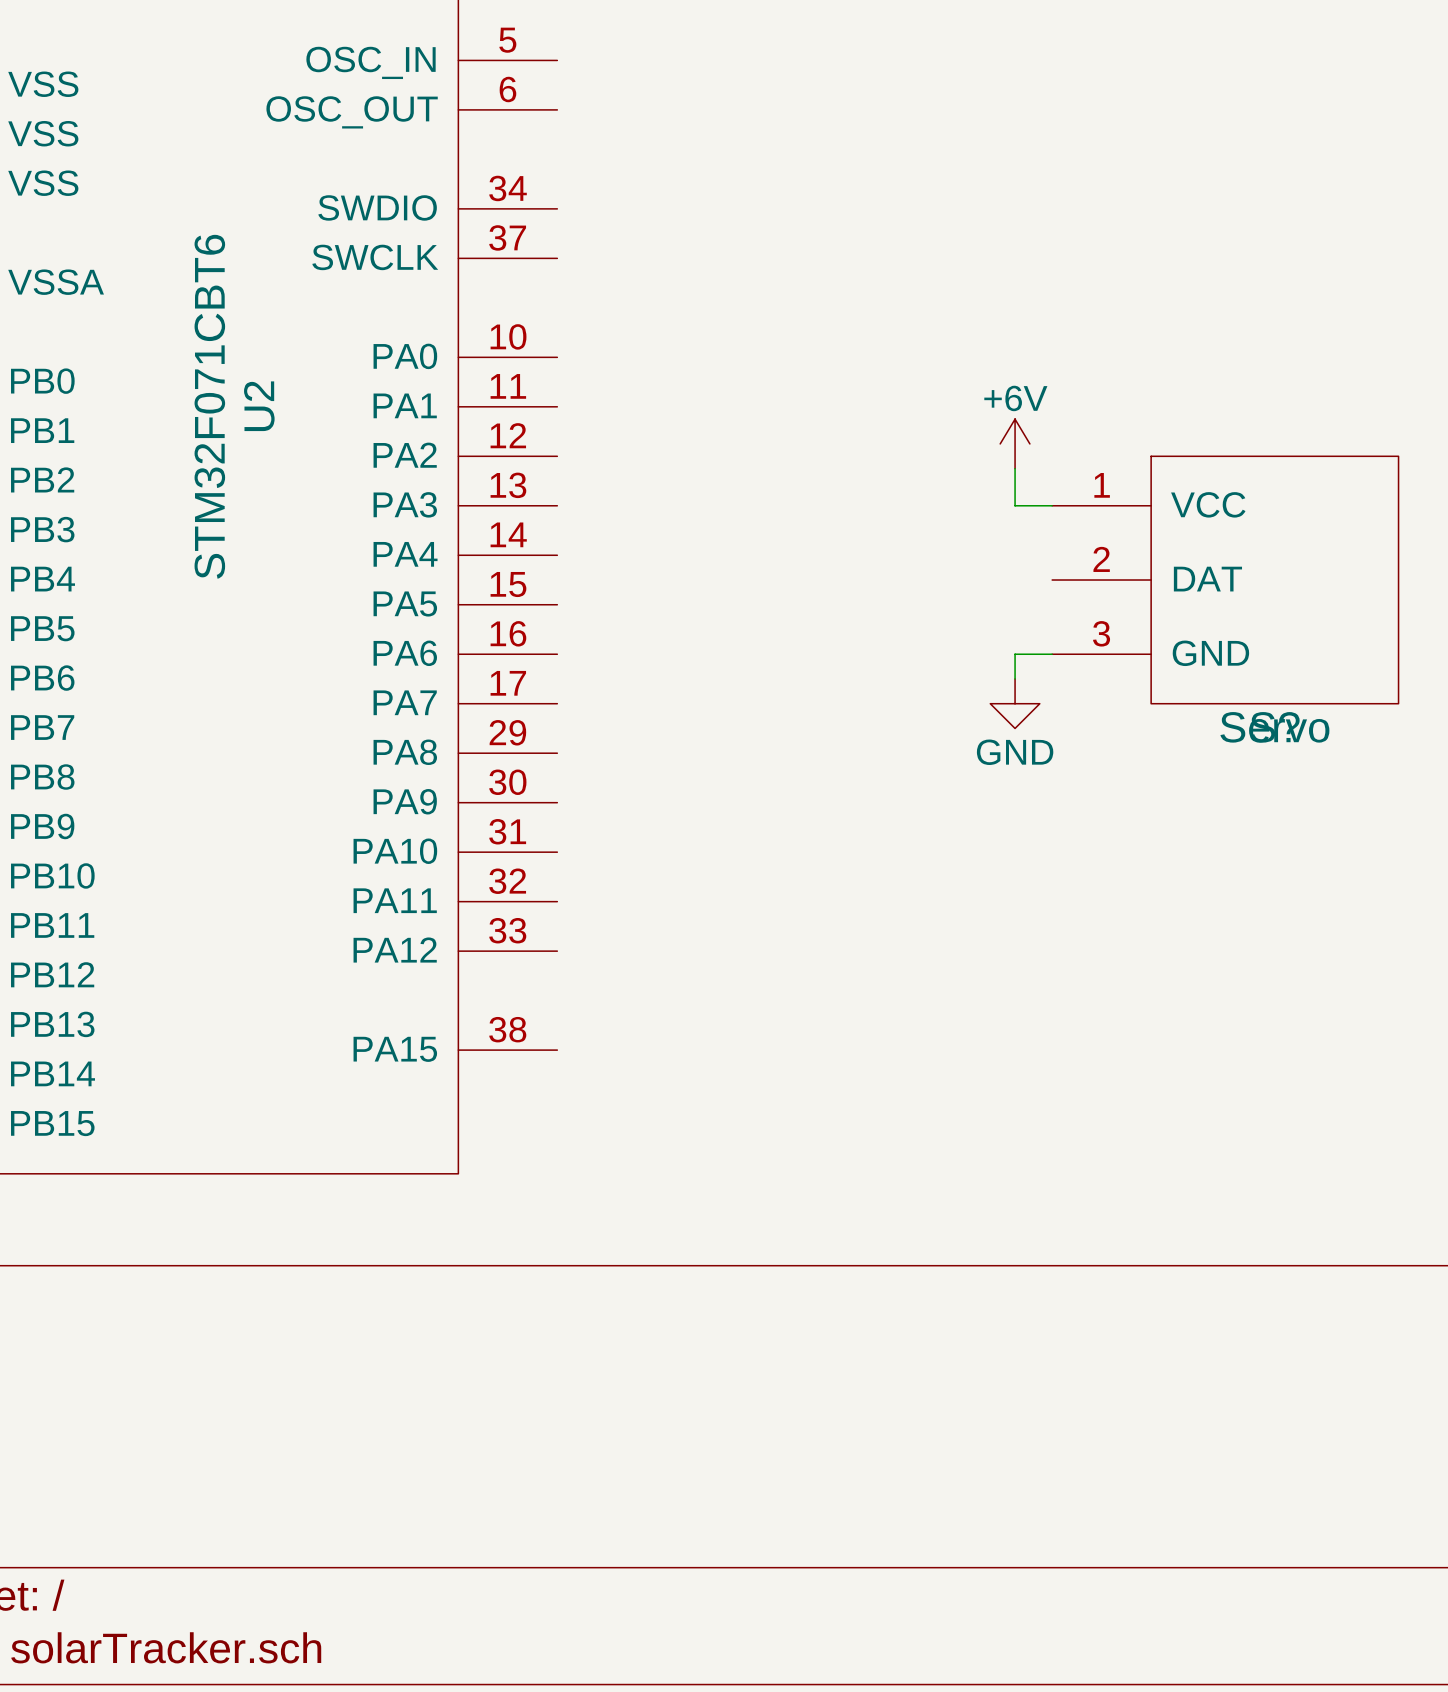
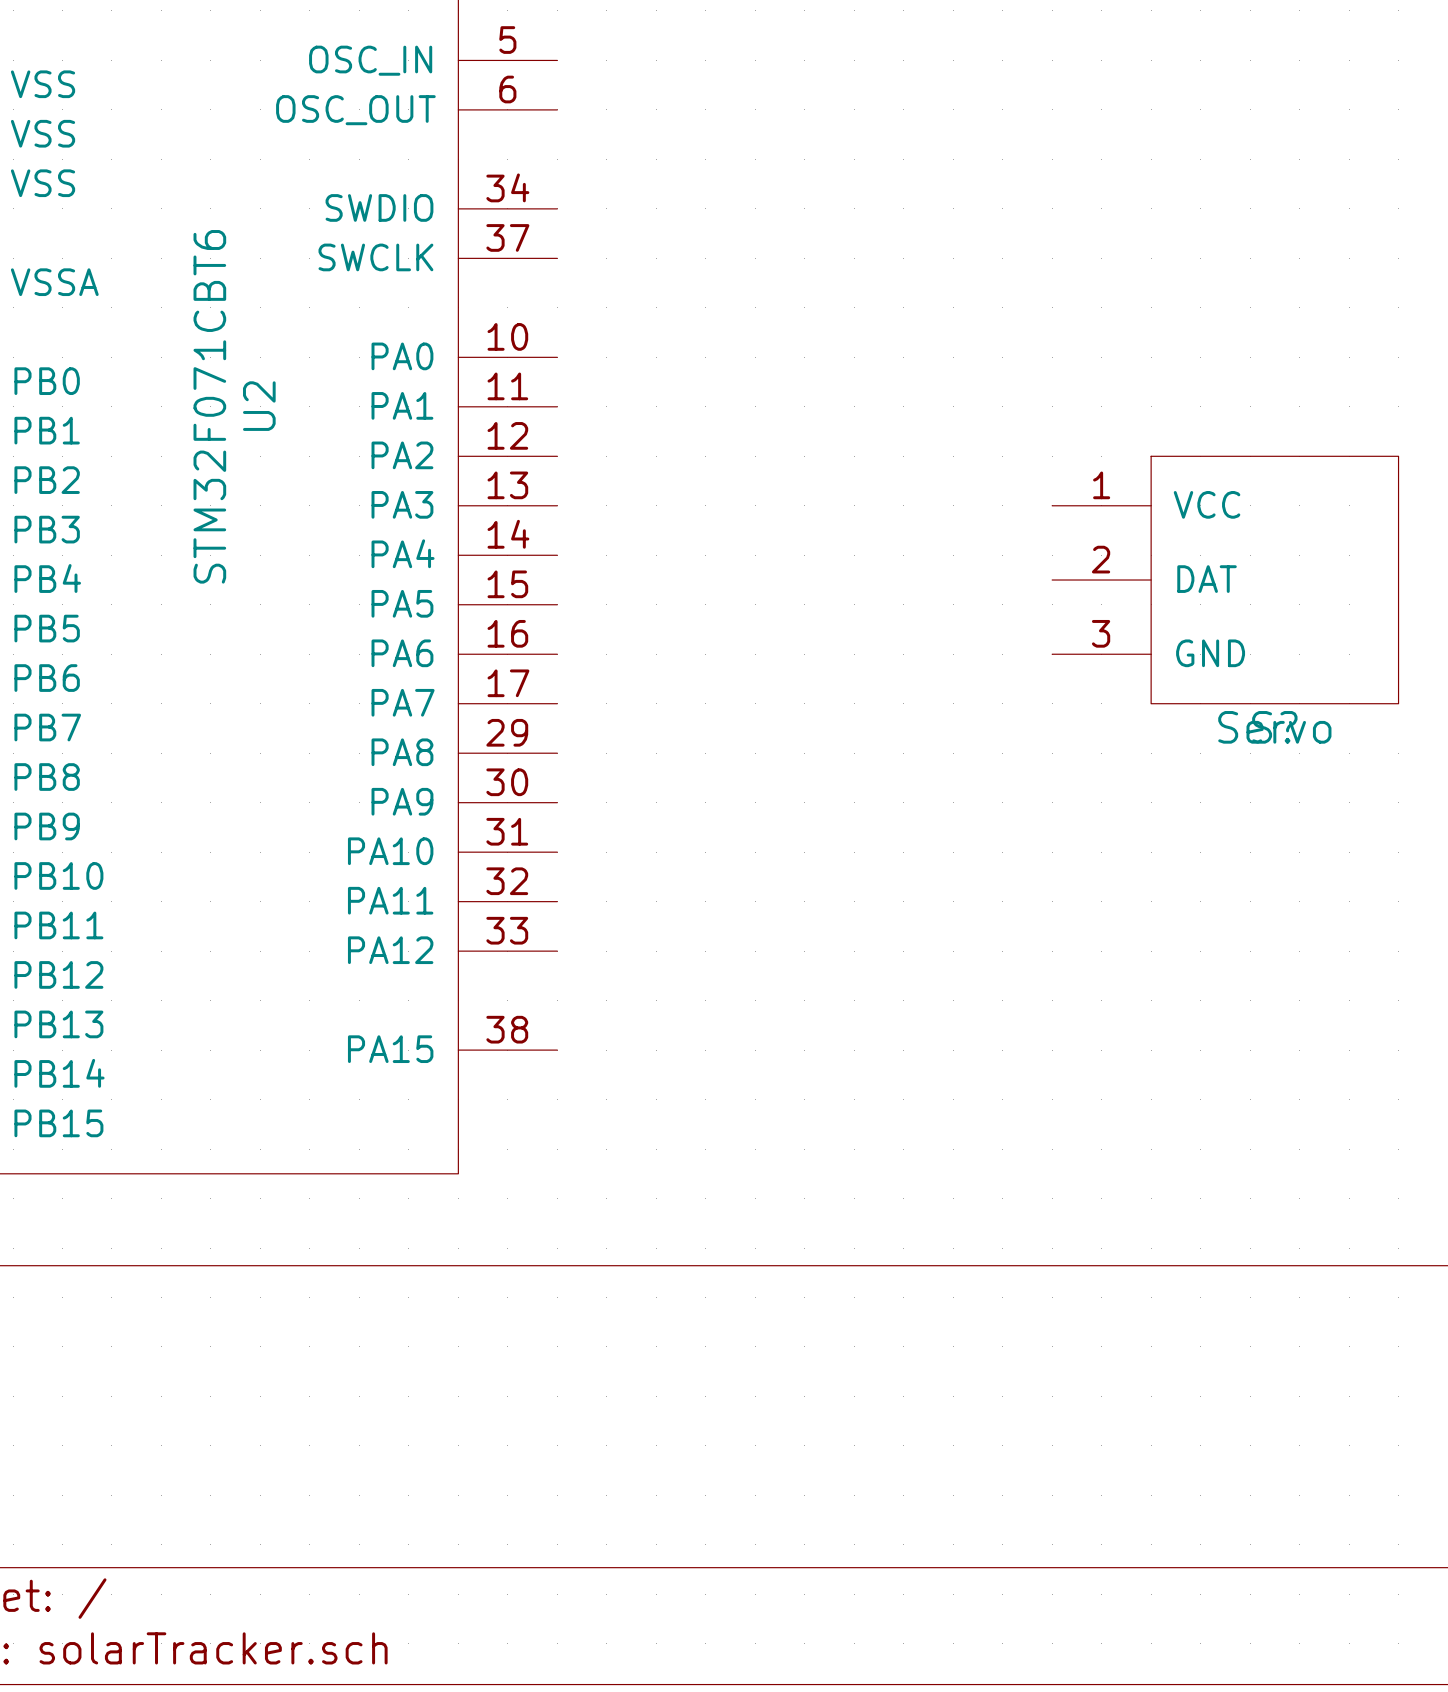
power symbol: +6V (1015, 443) -> none
wire: (1015, 468) (1015, 505) (1052, 505) -> none
wire: (1052, 654) (1015, 654) (1015, 678) -> none
power symbol: GND (1015, 703) -> none

